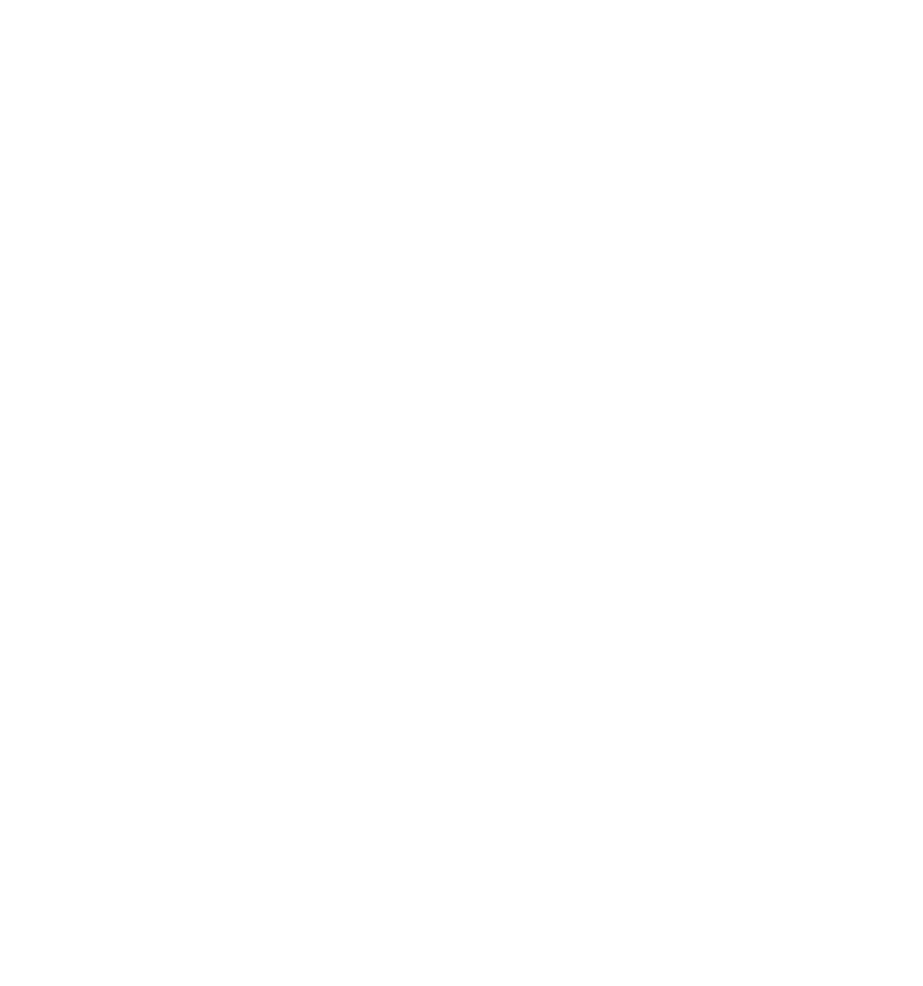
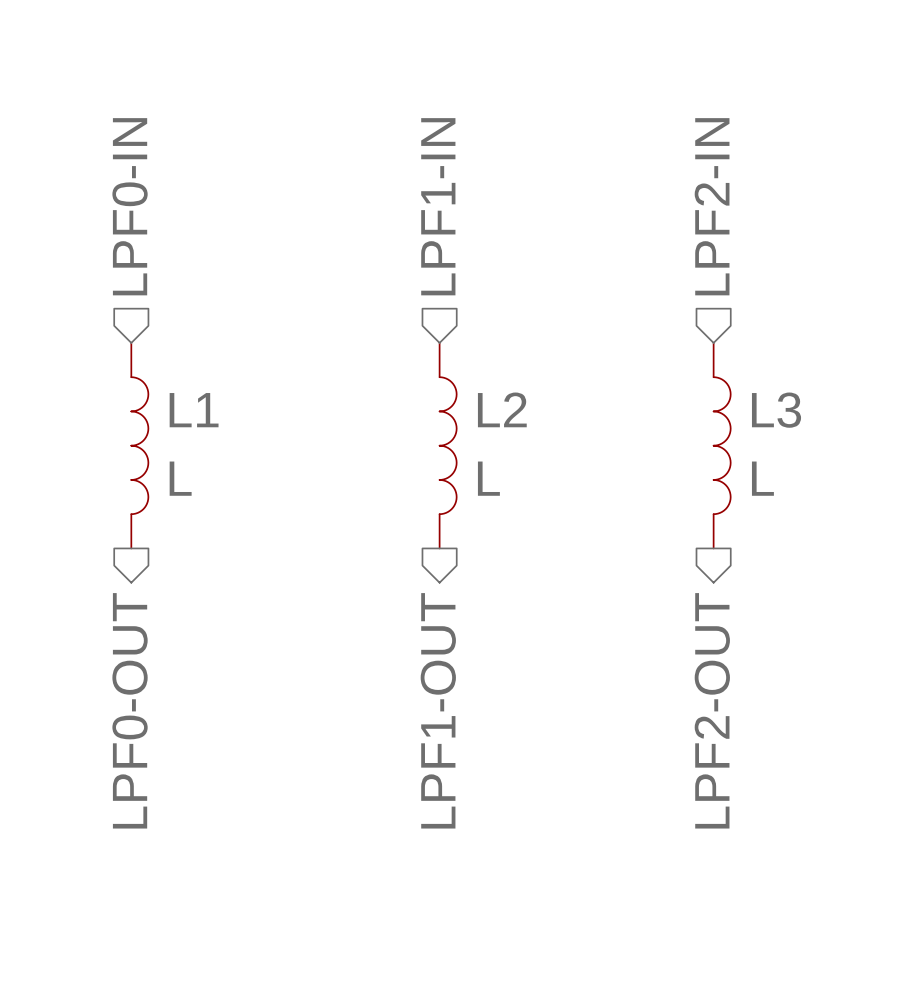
hierarchical label: none -> LPF0-IN (130, 206)
hierarchical label: none -> LPF1-IN (438, 206)
hierarchical label: none -> LPF2-IN (712, 206)
L1: none -> L (139, 445)
L2: none -> L (448, 445)
L3: none -> L (722, 445)
hierarchical label: none -> LPF0-OUT (130, 710)
hierarchical label: none -> LPF1-OUT (438, 710)
hierarchical label: none -> LPF2-OUT (712, 710)

